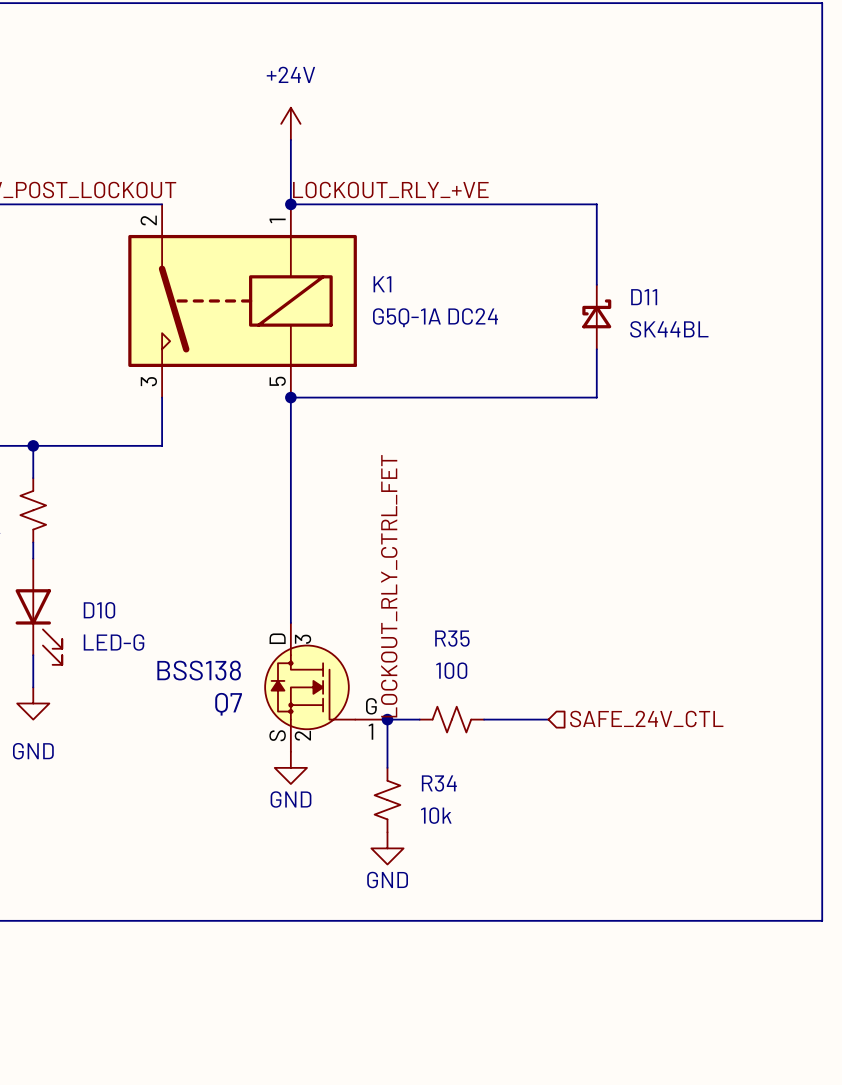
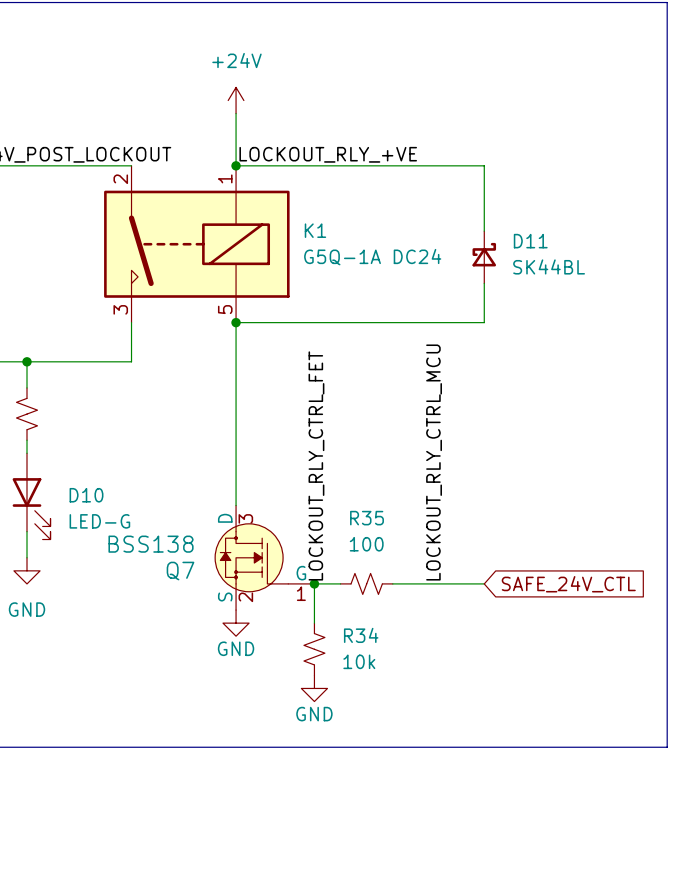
label: none -> LOCKOUT_RLY_CTRL_MCU (434, 462)
wire: none -> (445, 583) (484, 583)
hierarchical label: SAFE_24V_CTL (646, 719) -> none
global label: none -> SAFE_24V_CTL (568, 584)

